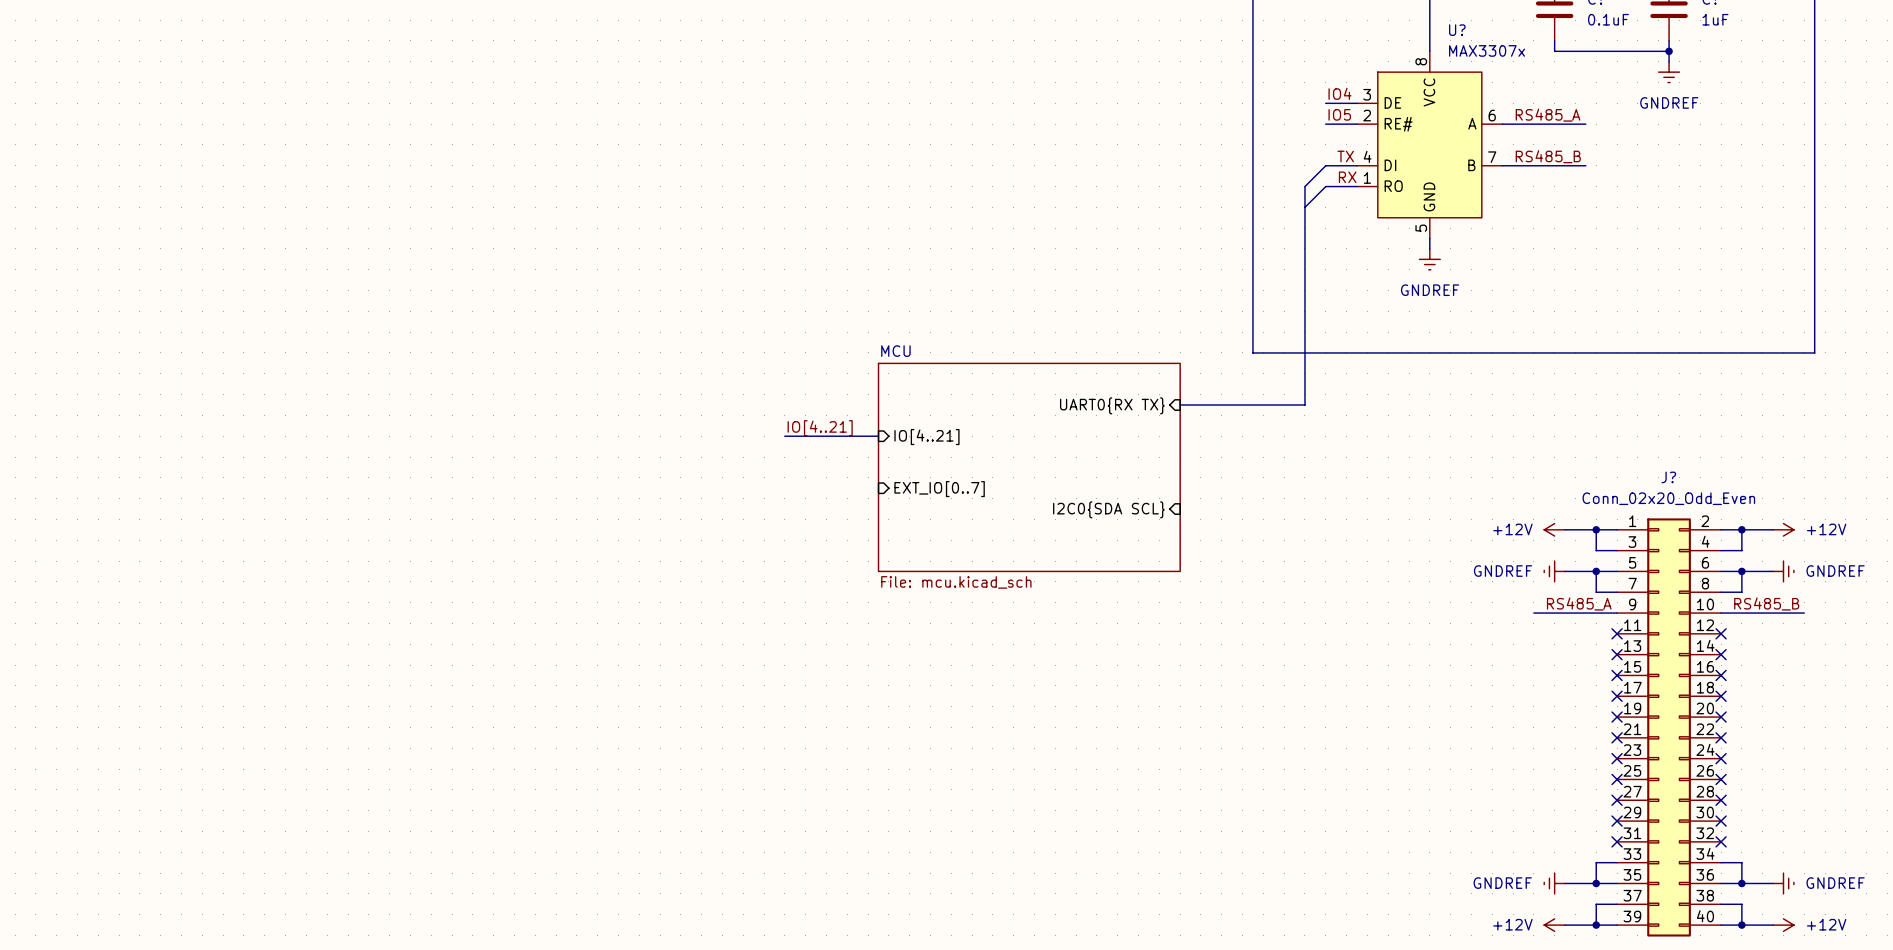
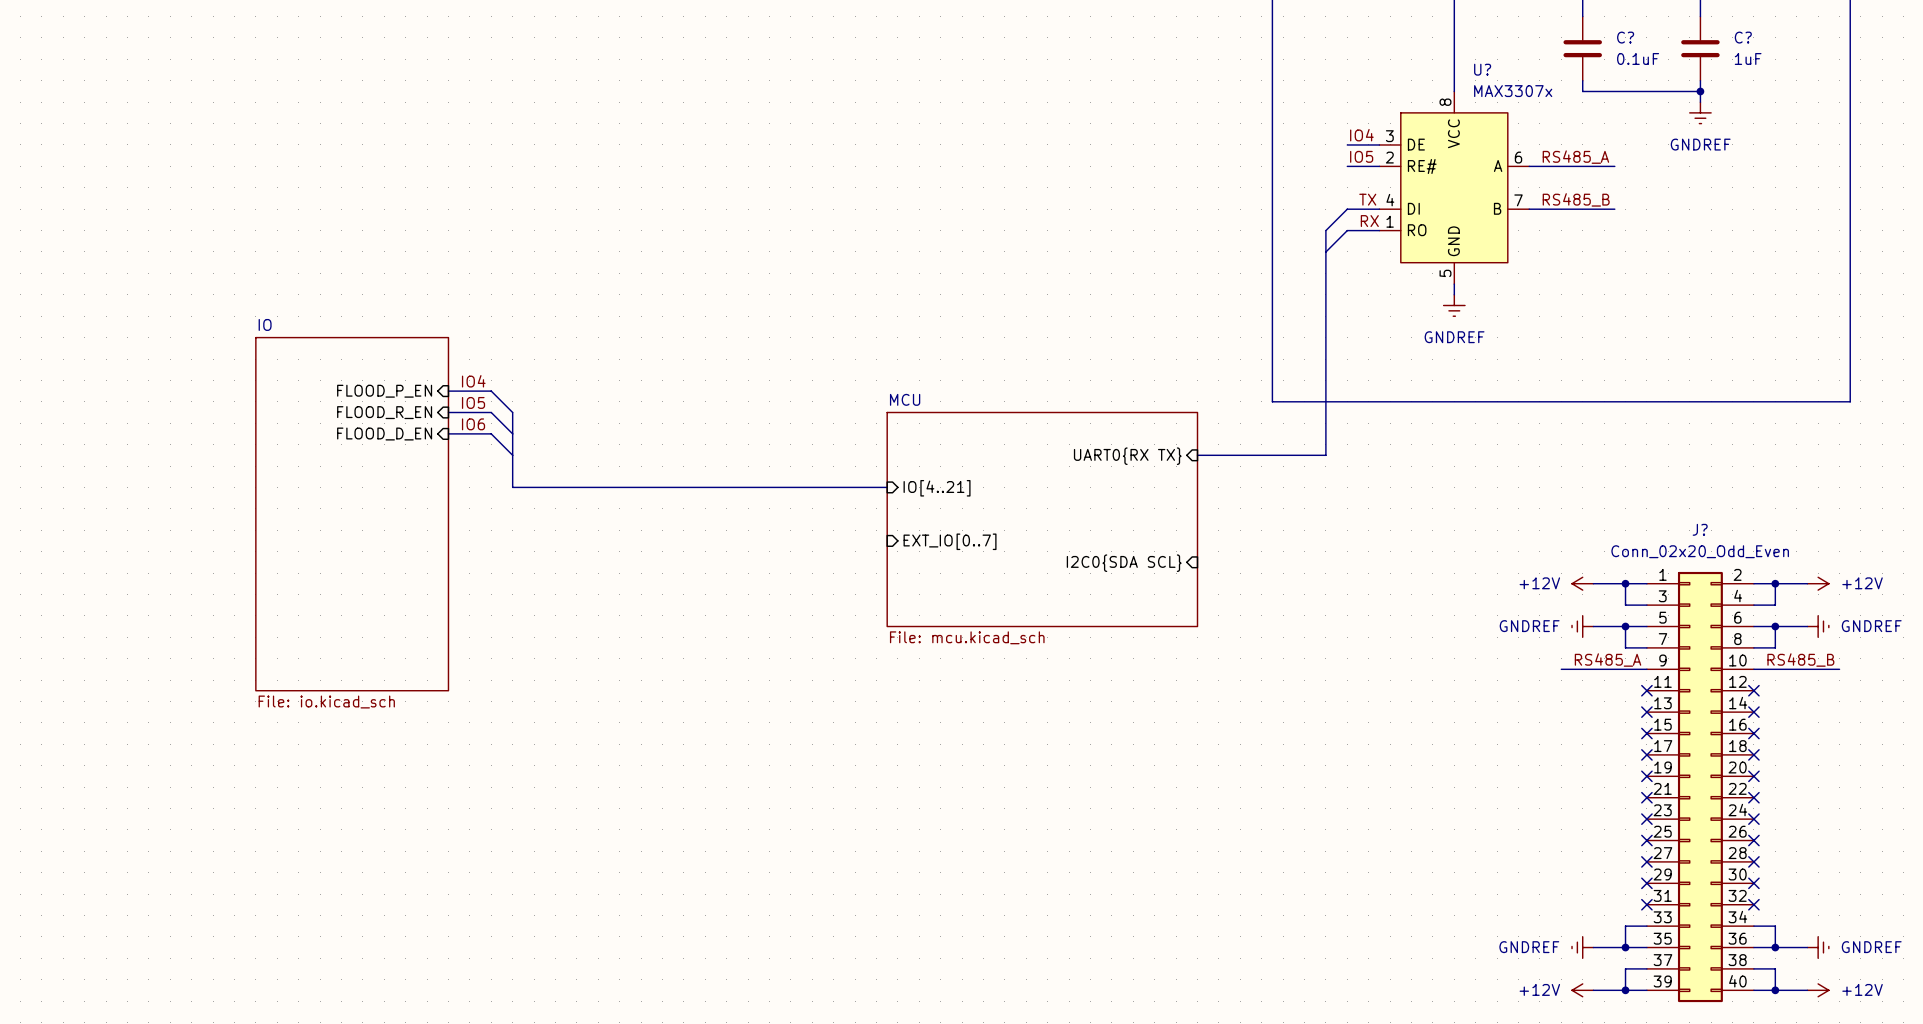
label: none -> IO4 (473, 381)
sheet pin: none -> FLOOD_P_EN (384, 391)
wire: none -> (448, 391) (491, 391) (512, 412)
label: none -> IO5 (473, 402)
sheet pin: none -> FLOOD_R_EN (384, 412)
wire: none -> (448, 412) (491, 412) (512, 433)
bus: none -> (512, 412) (512, 487) (790, 487)
label: none -> IO6 (473, 424)
sheet pin: none -> FLOOD_D_EN (384, 434)
wire: none -> (448, 433) (491, 433) (512, 455)
label: IO[4..21] (820, 428) -> none
sheet IO: none -> File: io.kicad_sch (352, 514)

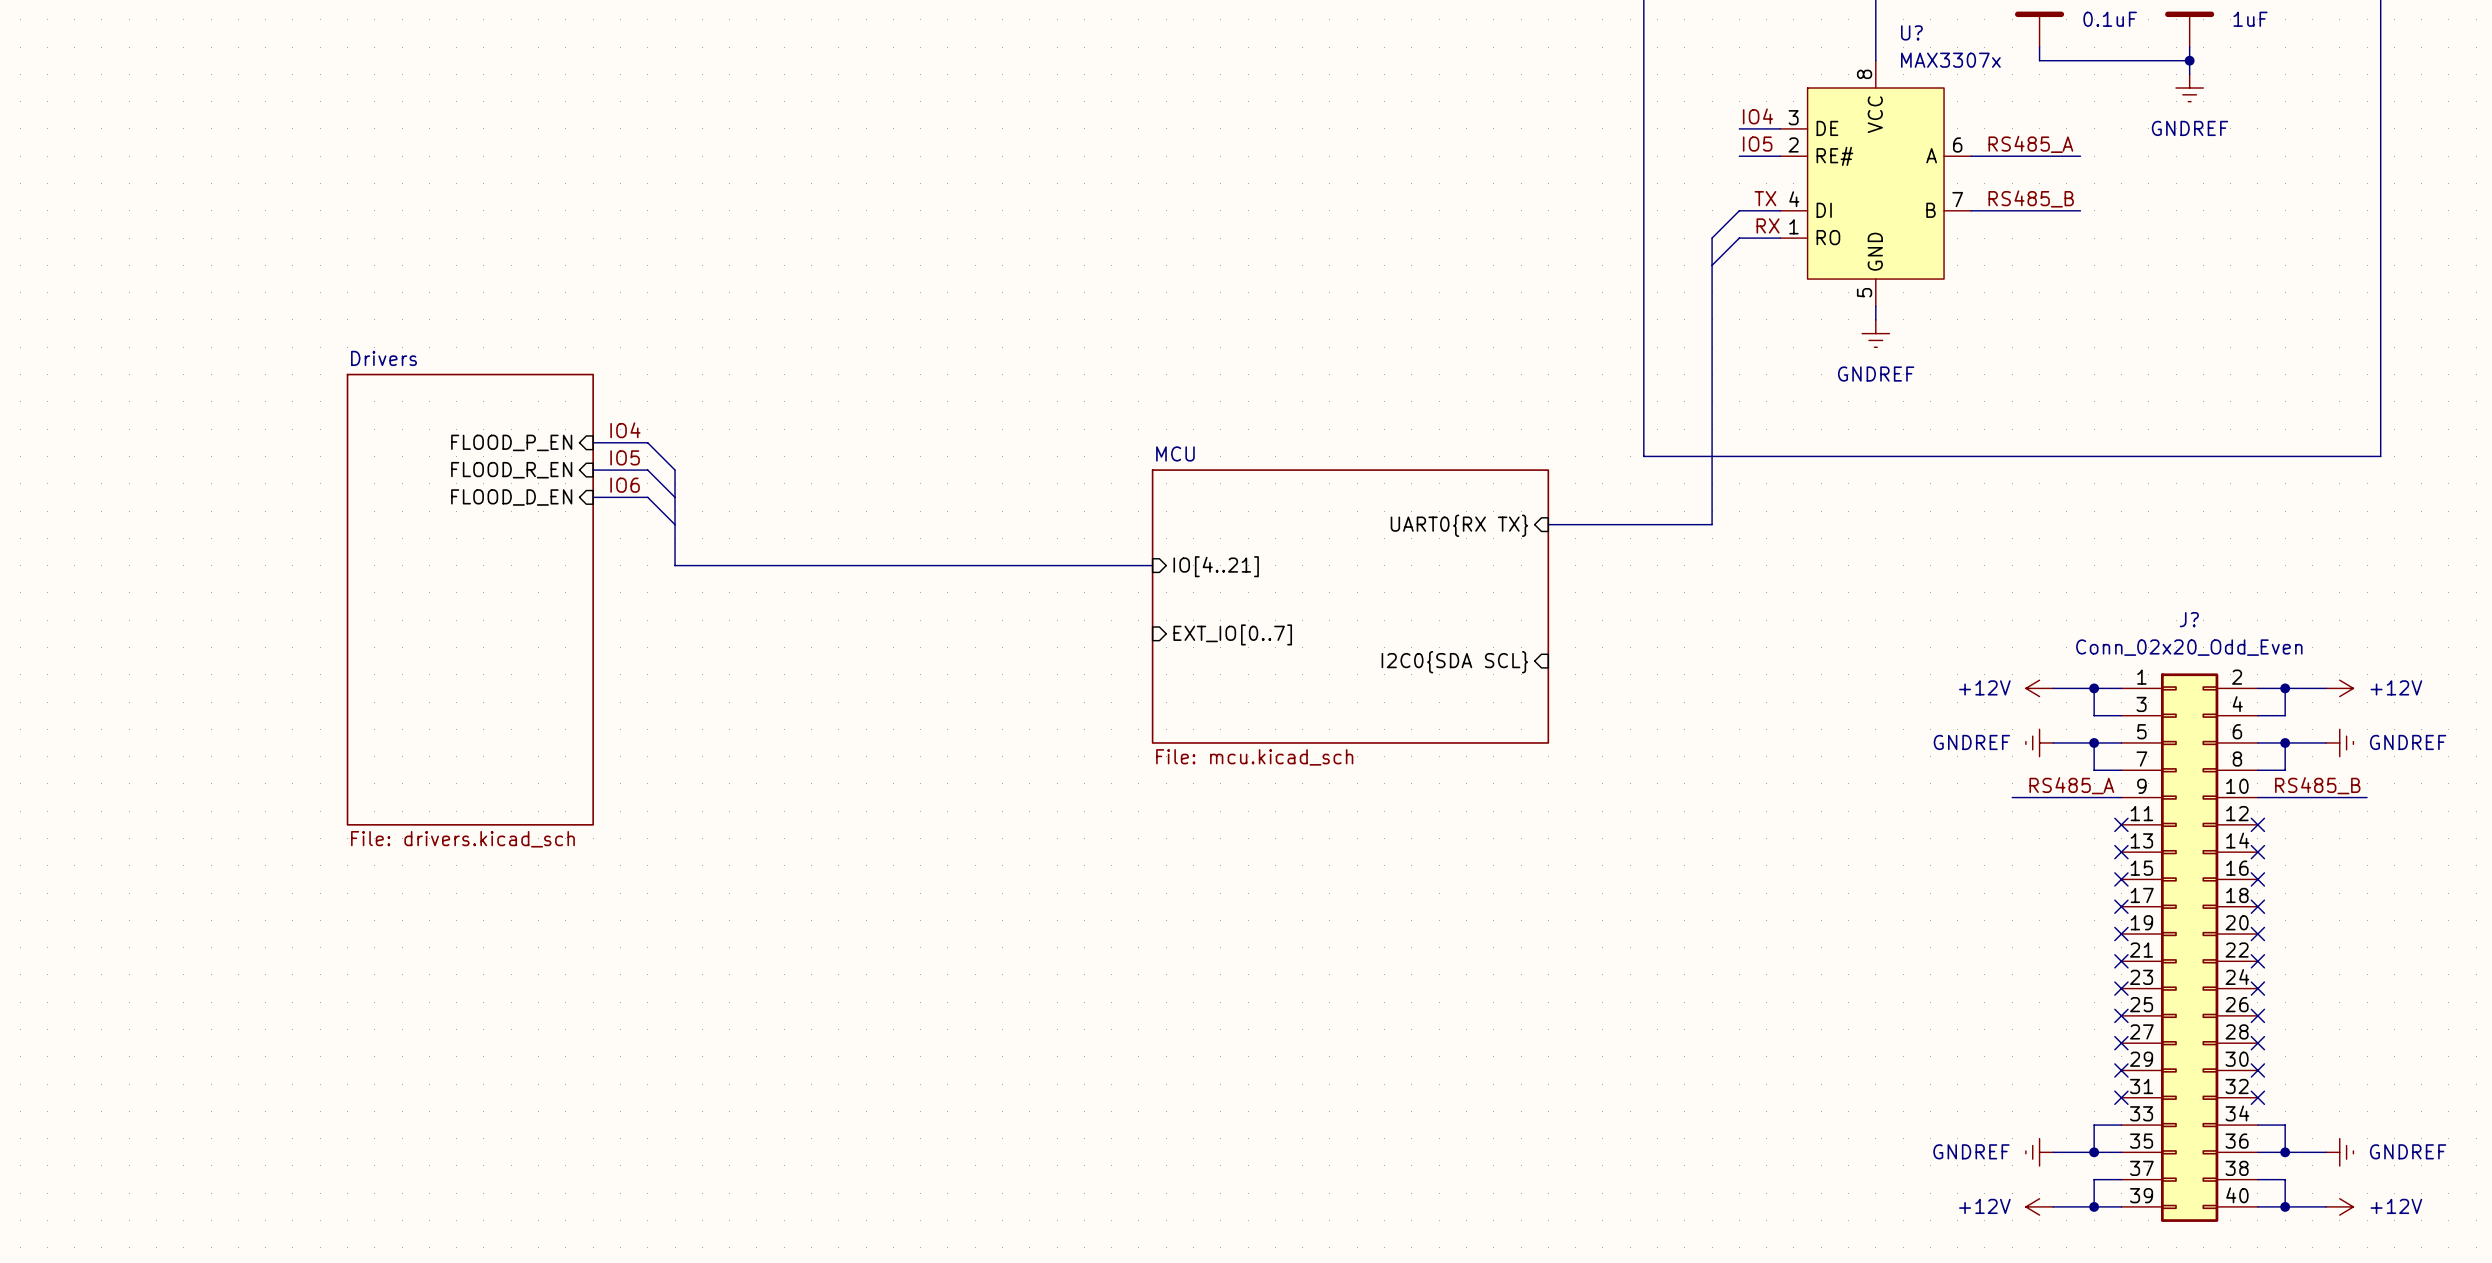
sheet IO name: IO (265, 324) -> Drivers (384, 358)
sheet IO value: File: io.kicad_sch (326, 702) -> File: drivers.kicad_sch (462, 839)

